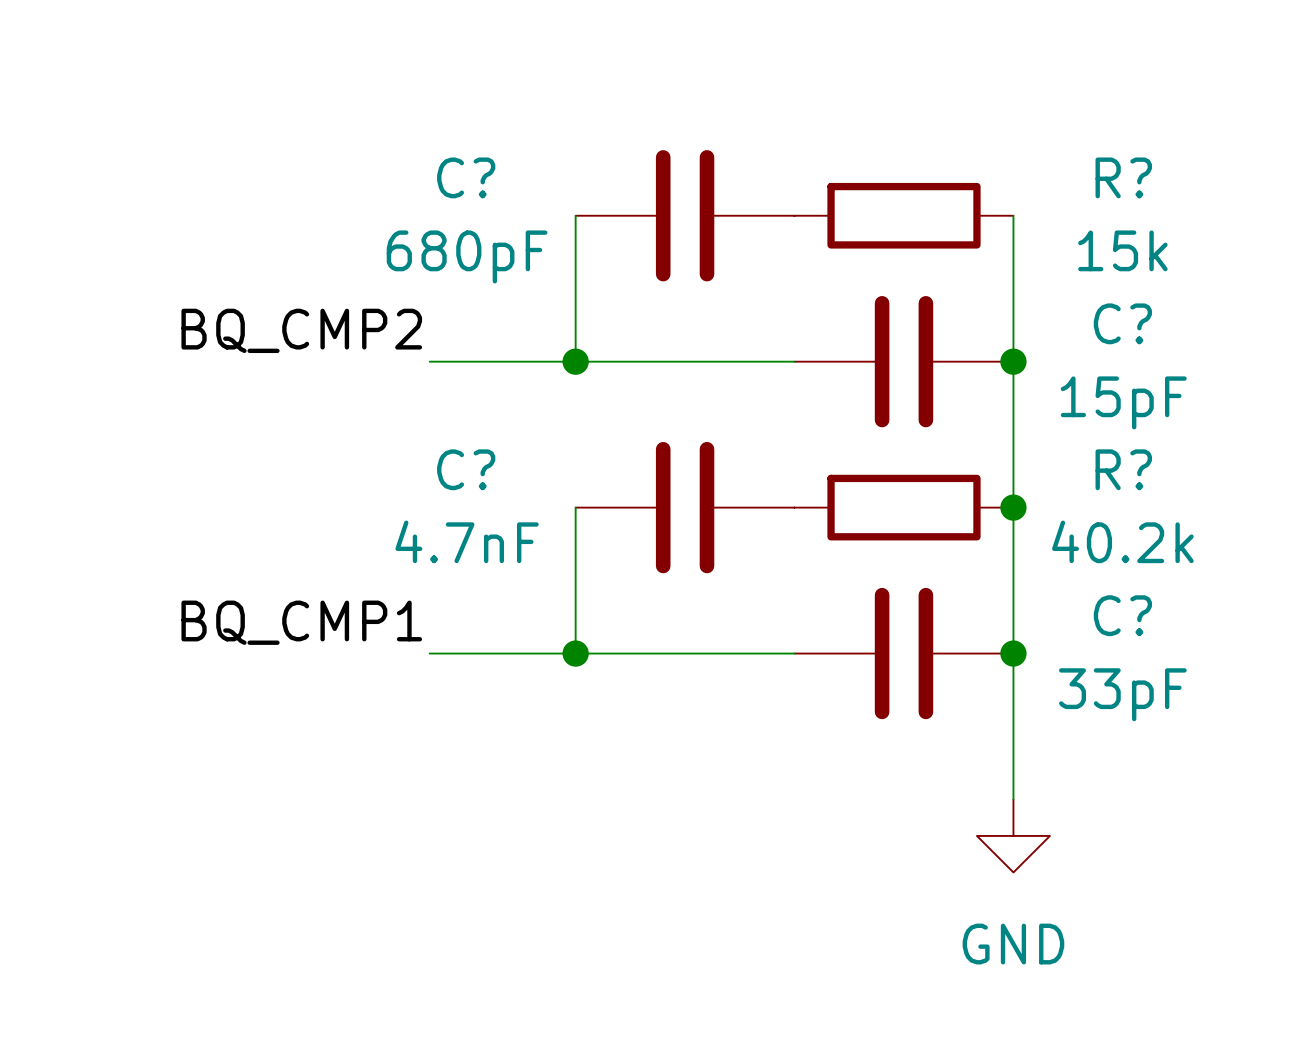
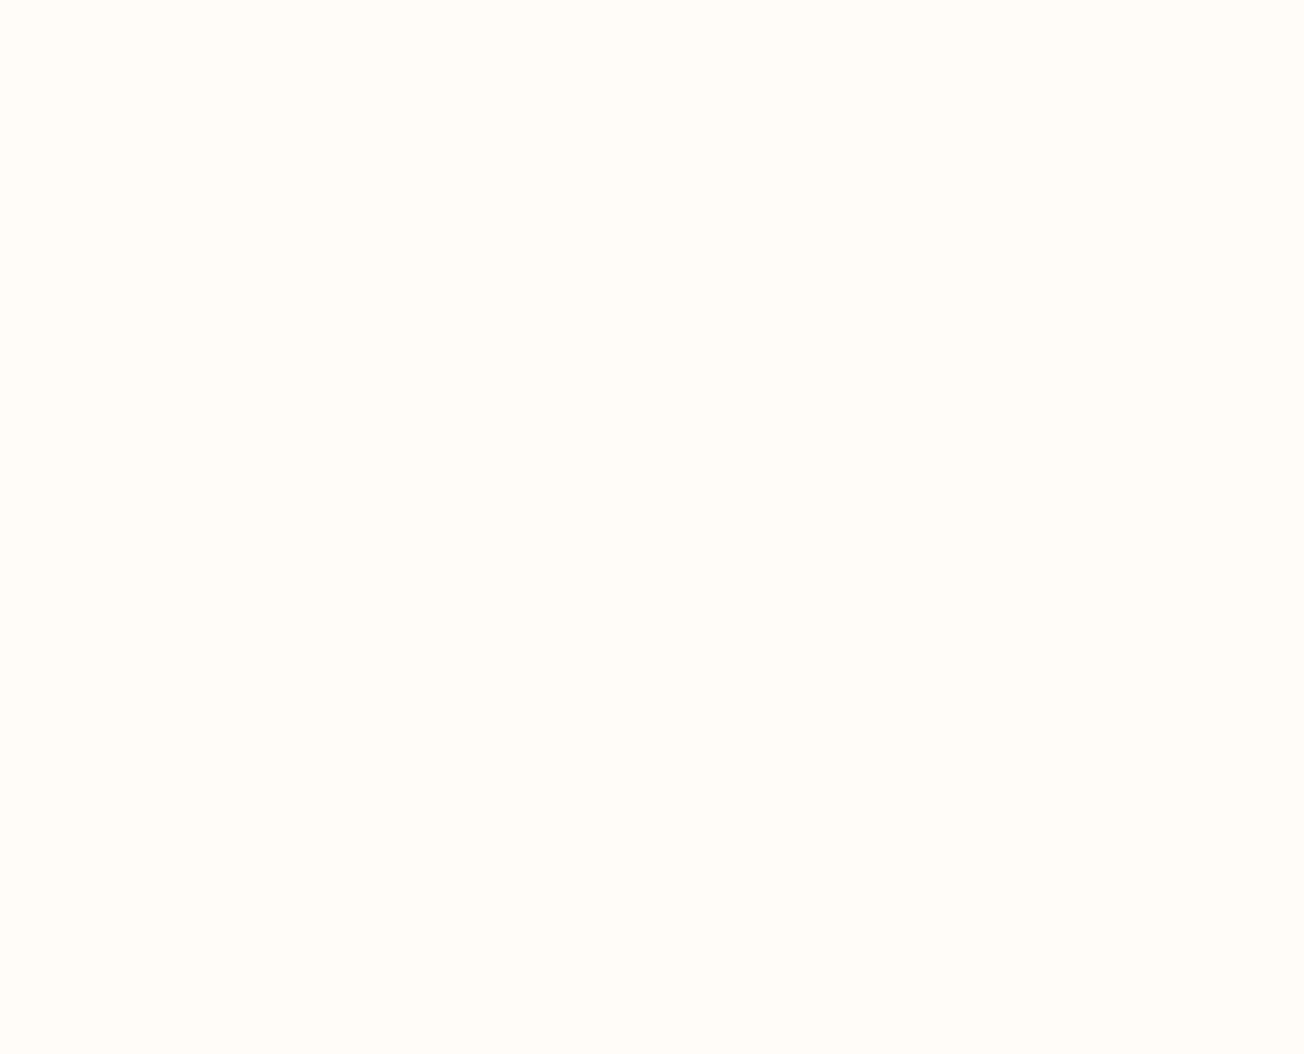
wire: (575, 215) (575, 361) -> none
C?: 680pF (685, 215) -> none
R?: 15k (904, 215) -> none
wire: (1013, 215) (1013, 799) -> none
label: BQ_CMP2 (301, 330) -> none
wire: (429, 361) (794, 361) -> none
junction: (575, 361) -> none
C?: 15pF (904, 361) -> none
junction: (1013, 361) -> none
wire: (575, 507) (575, 653) -> none
C?: 4.7nF (685, 507) -> none
R?: 40.2k (904, 507) -> none
junction: (1013, 507) -> none
label: BQ_CMP1 (301, 622) -> none
wire: (429, 653) (794, 653) -> none
junction: (575, 653) -> none
C?: 33pF (904, 653) -> none
junction: (1013, 653) -> none
power symbol: GND (1013, 835) -> none

